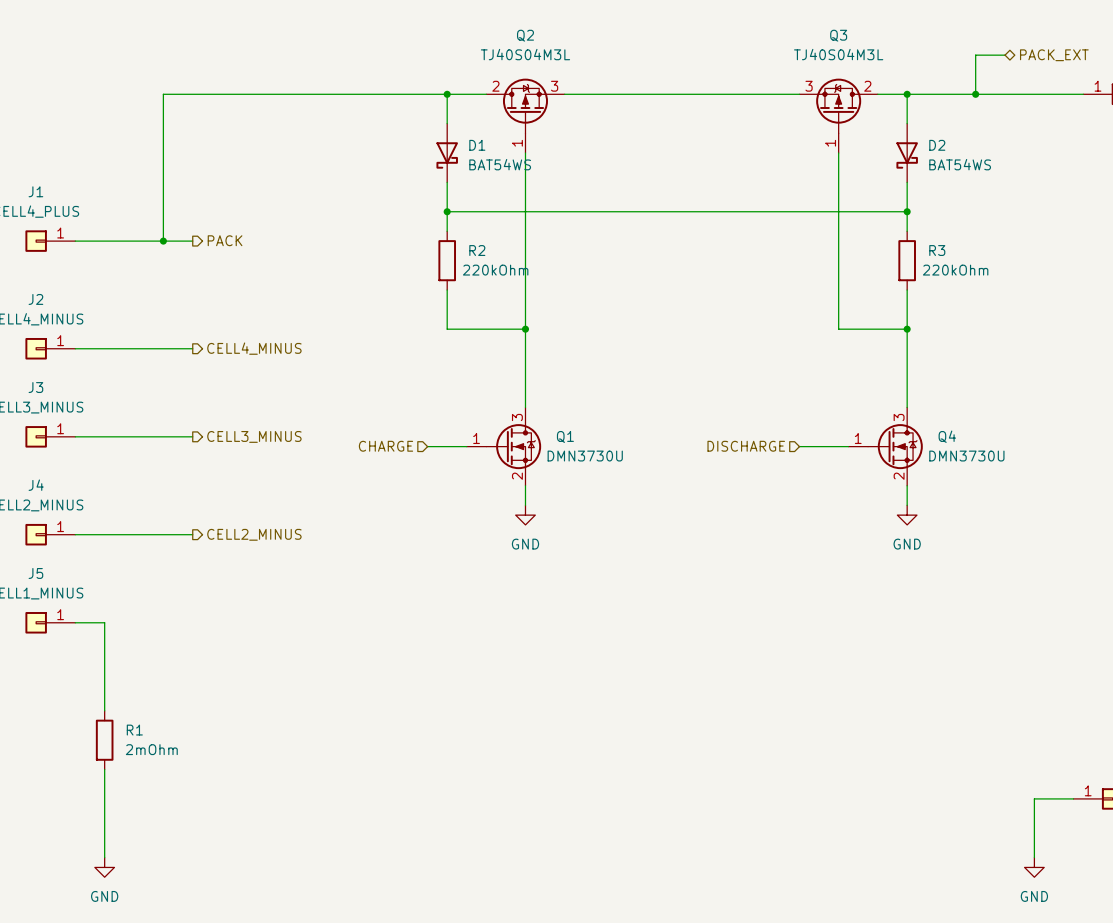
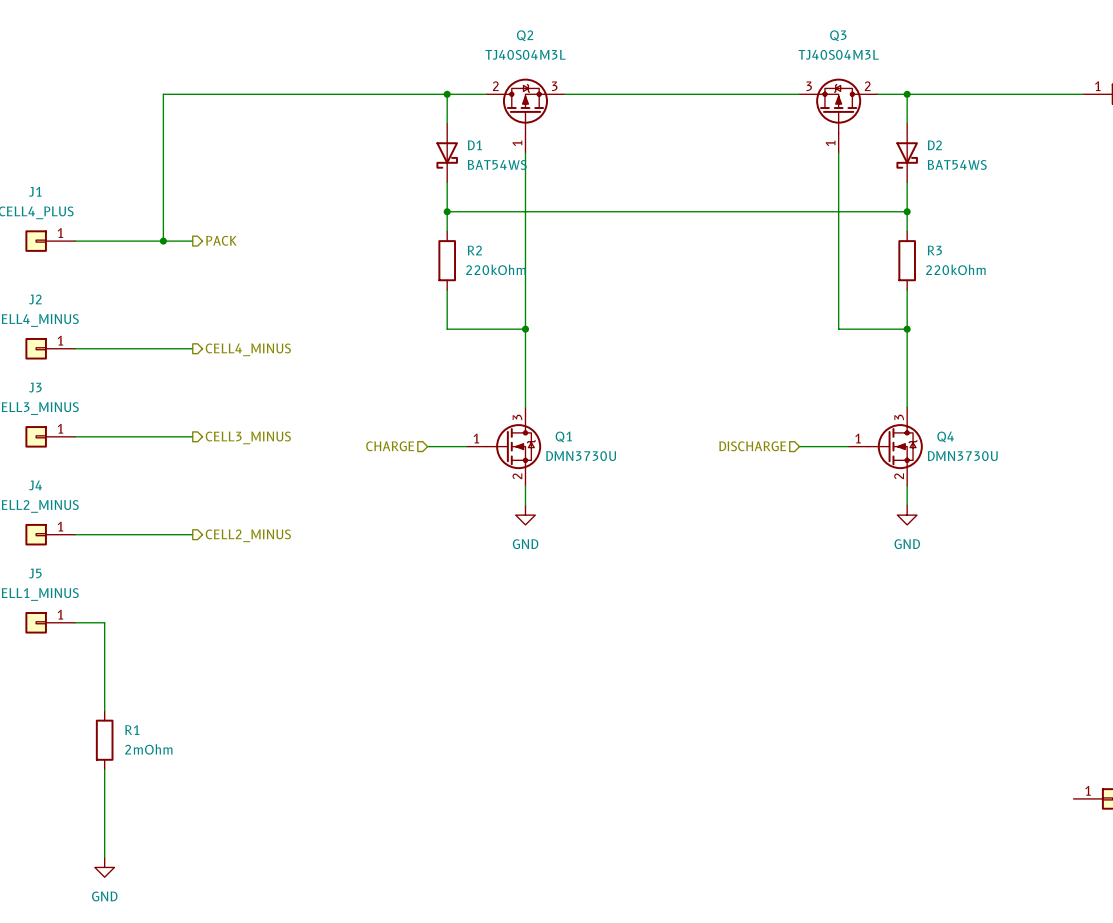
wire: (1005, 55) (975, 55) (975, 94) -> none
hierarchical label: PACK_EXT (1054, 55) -> none
junction: (975, 94) -> none
wire: (1073, 798) (1034, 798) (1034, 857) -> none
power symbol: GND (1034, 867) -> none

